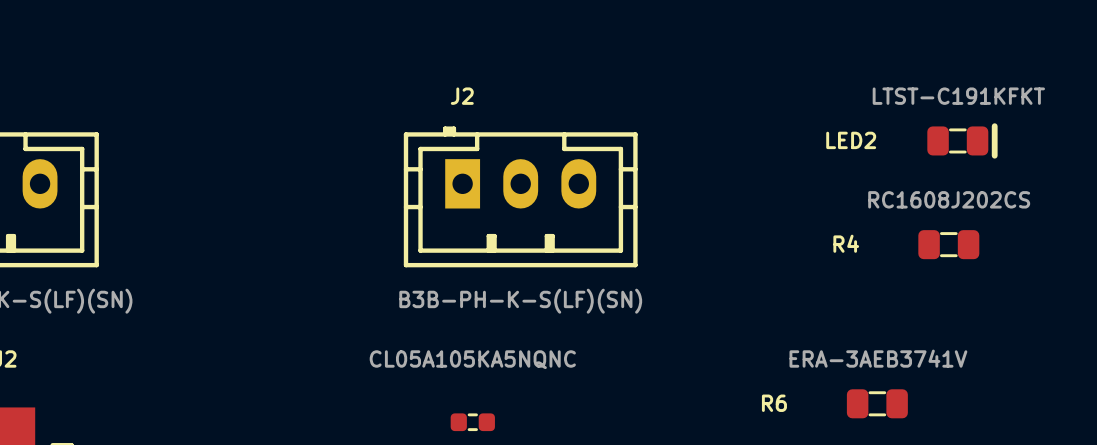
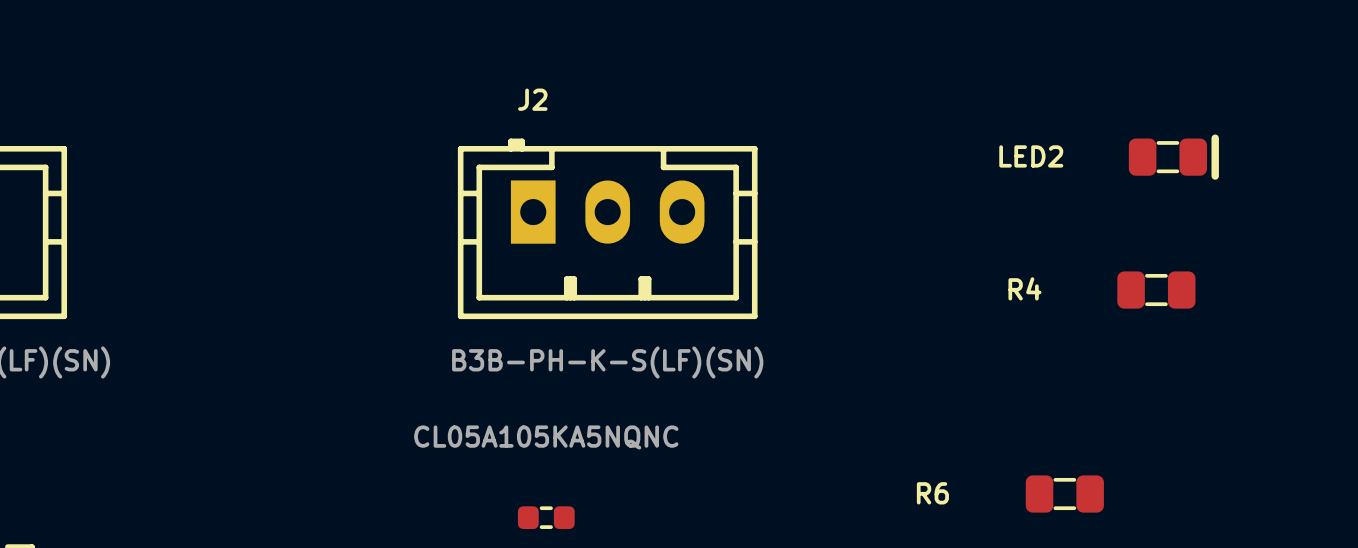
LED2 value: LTST-C191KFKT (958, 96) -> none
R4 value: RC1608J202CS (949, 199) -> none
R6 value: ERA-3AEB3741V (878, 358) -> none

